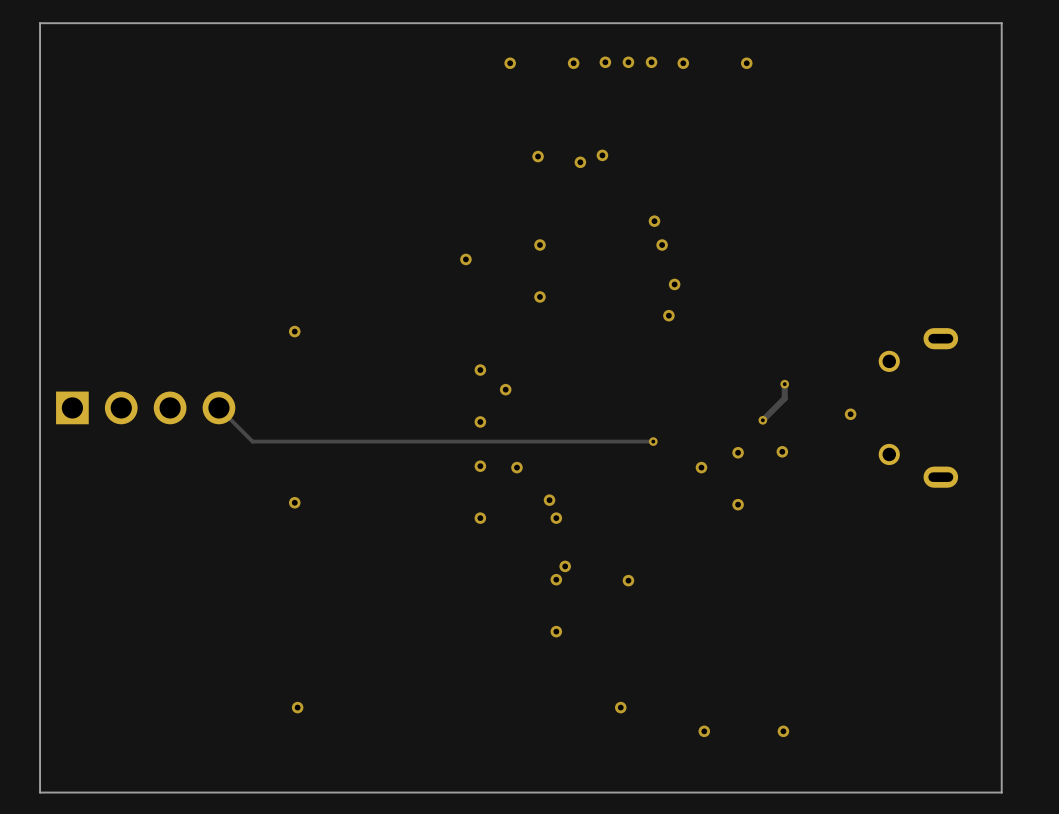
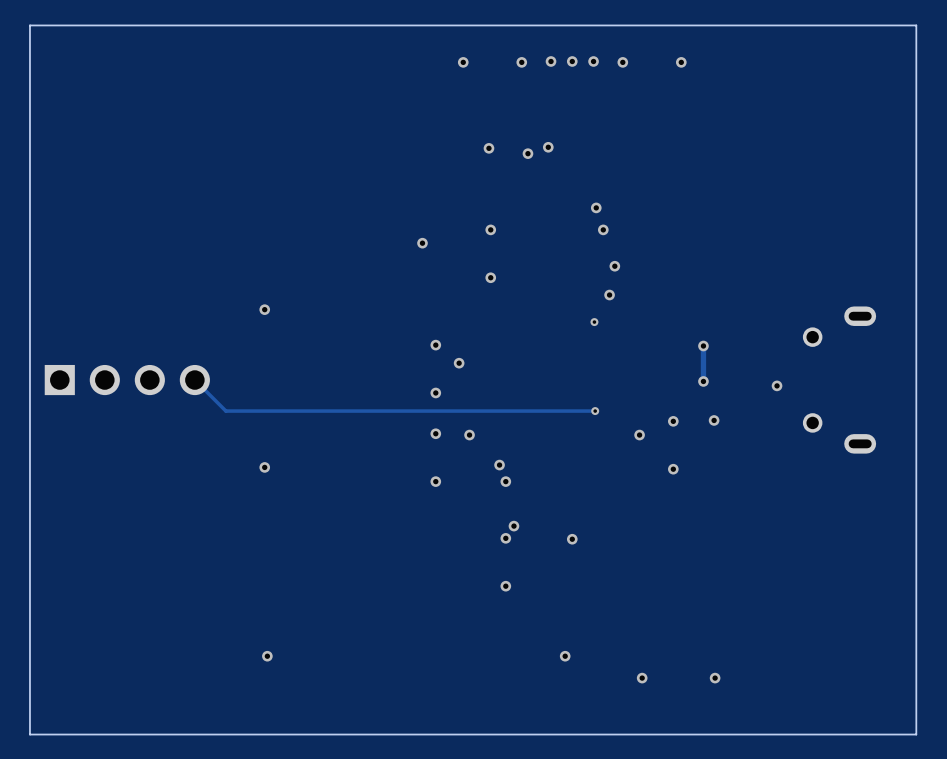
via: none -> (594, 322)
track: none -> (703, 346) (703, 381)
via: none -> (703, 346)
track: (784, 384) (784, 398) (762, 420) -> none
via: (784, 384) -> none
via: none -> (703, 381)
via: (762, 420) -> none

